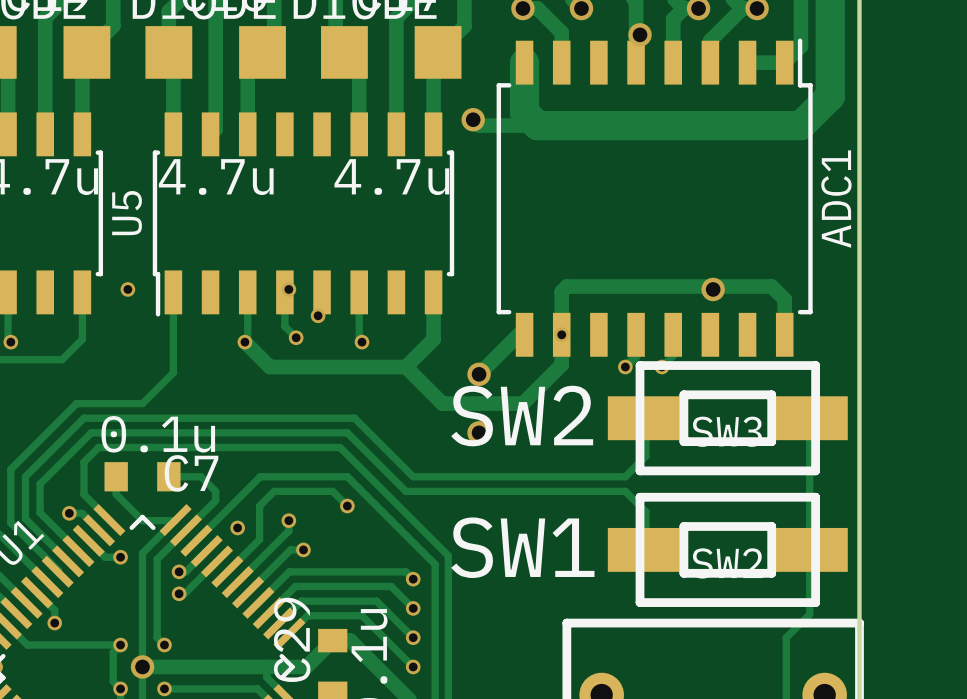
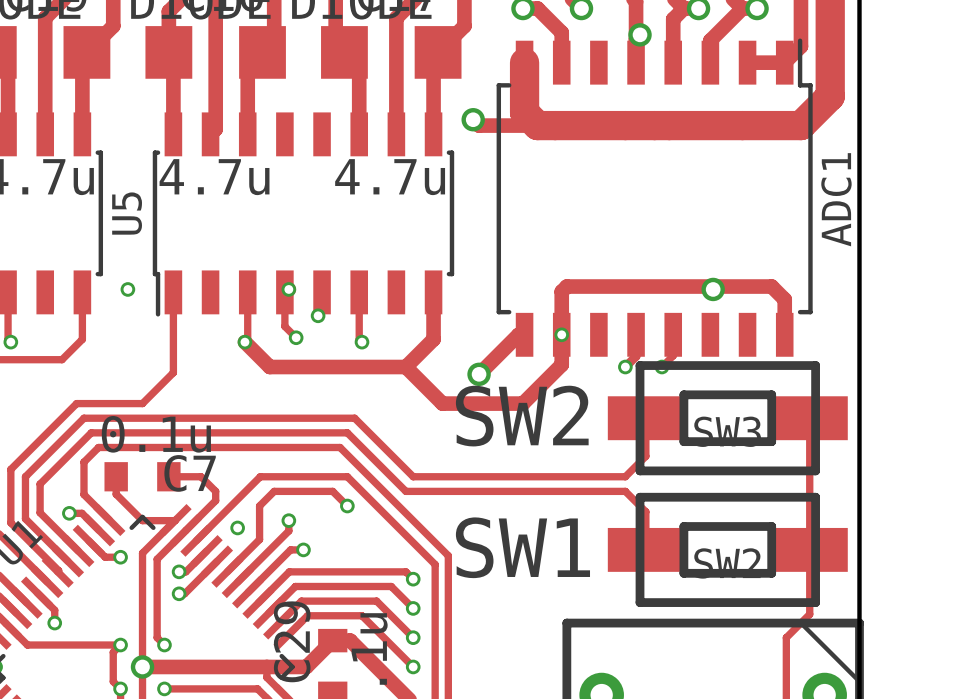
via: (479, 432) -> none
line: none -> (800, 623) (859, 681)

